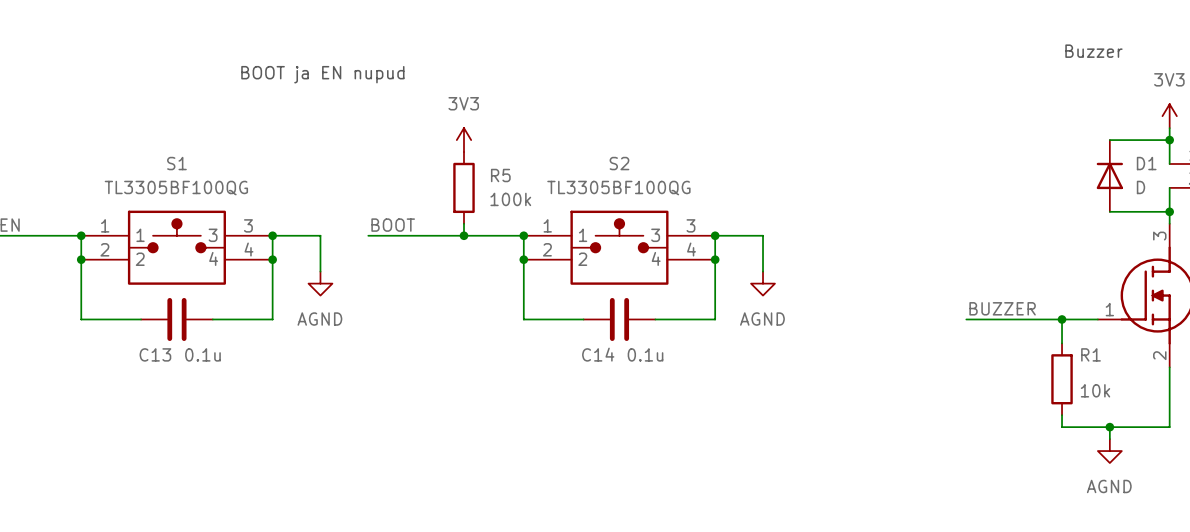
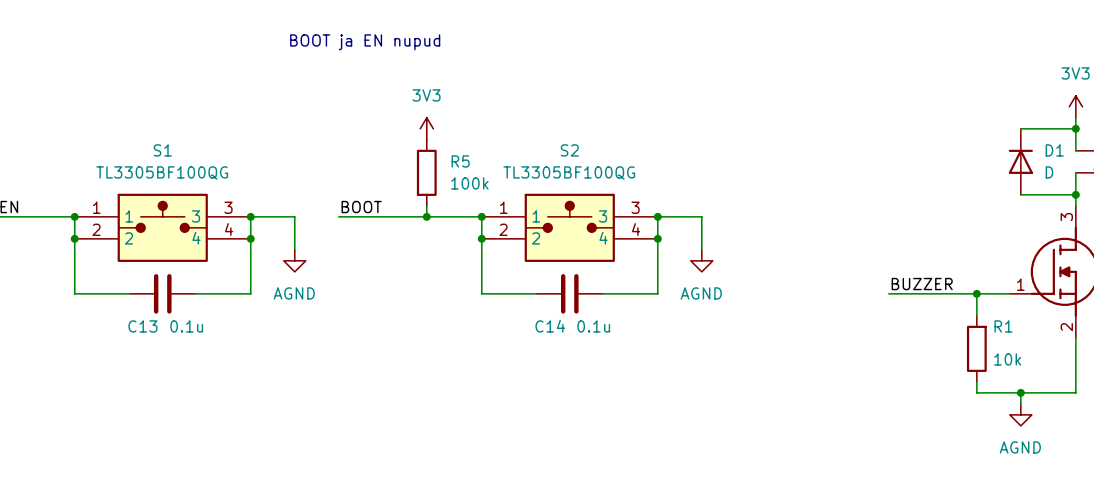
text: Buzzer (1093, 51) -> none
text position: BOOT ja EN nupud (322, 74) -> BOOT ja EN nupud (365, 42)

